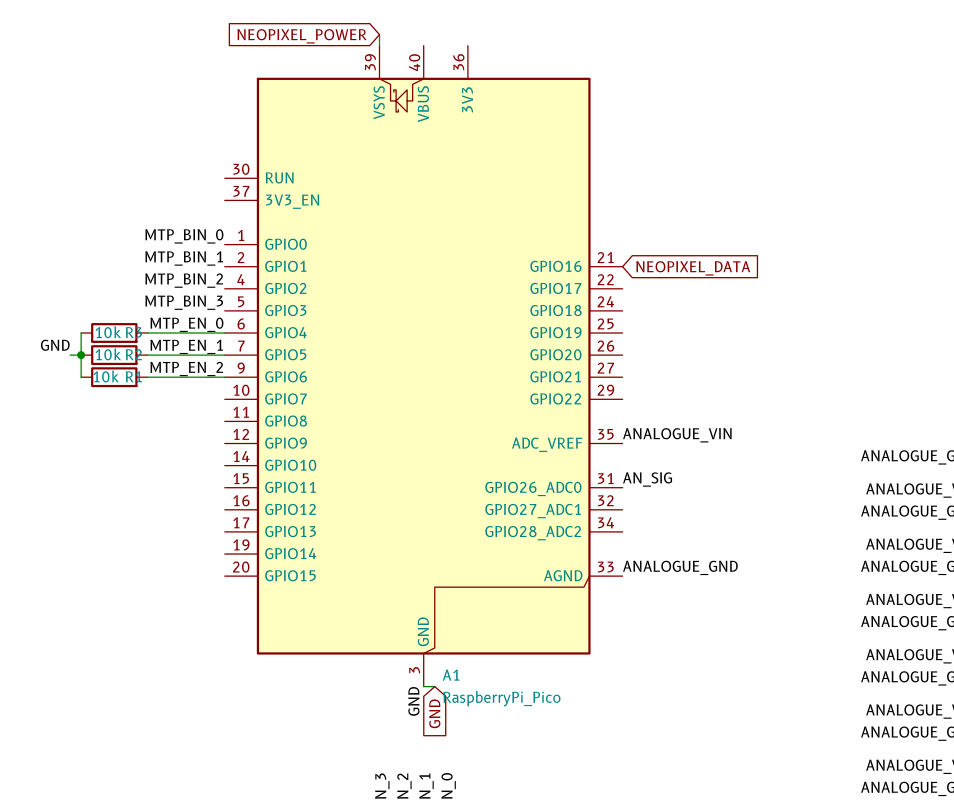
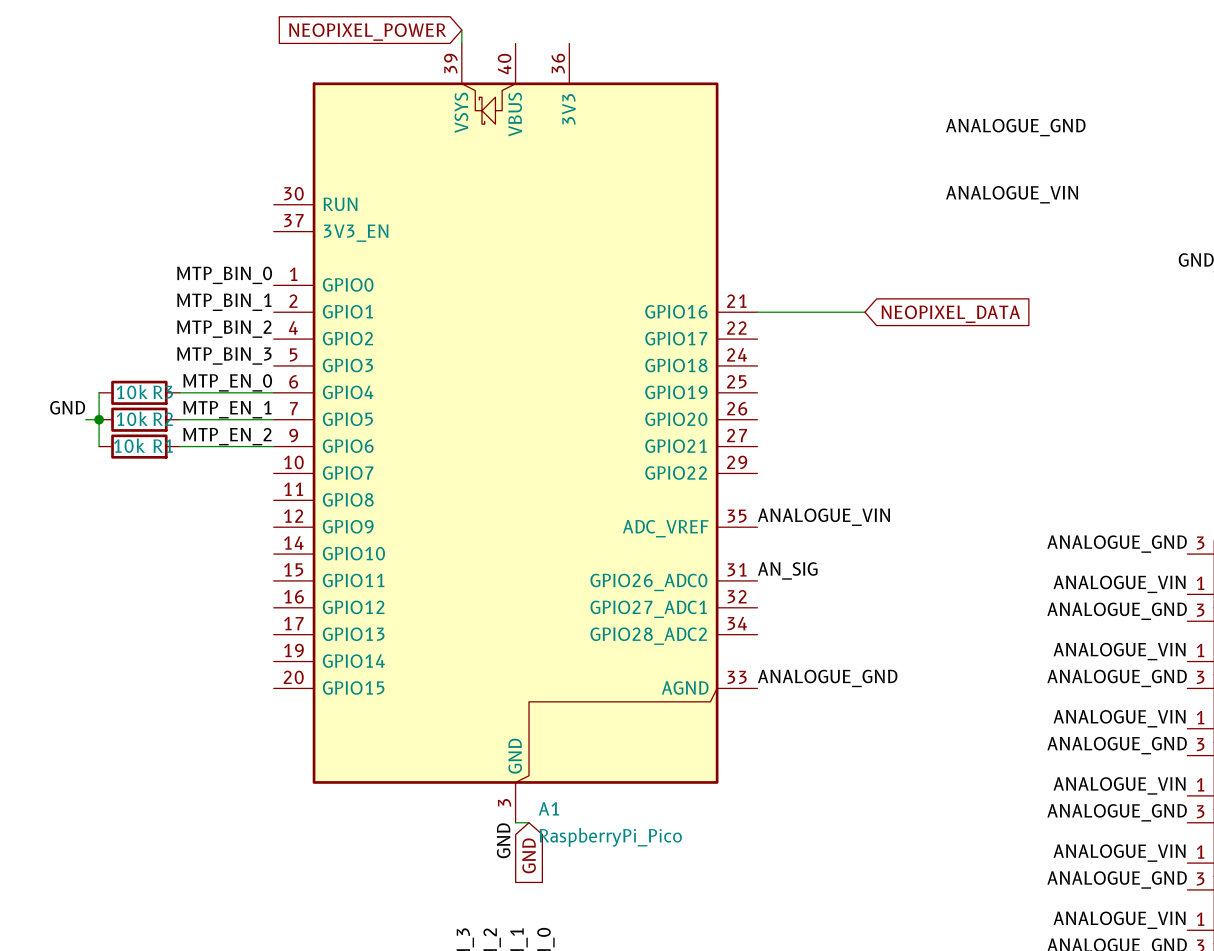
label: none -> ANALOGUE_GND (1015, 127)
label: none -> ANALOGUE_VIN (1012, 194)
wire: none -> (757, 312) (864, 312)
global label position: NEOPIXEL_DATA (693, 268) -> NEOPIXEL_DATA (950, 314)

